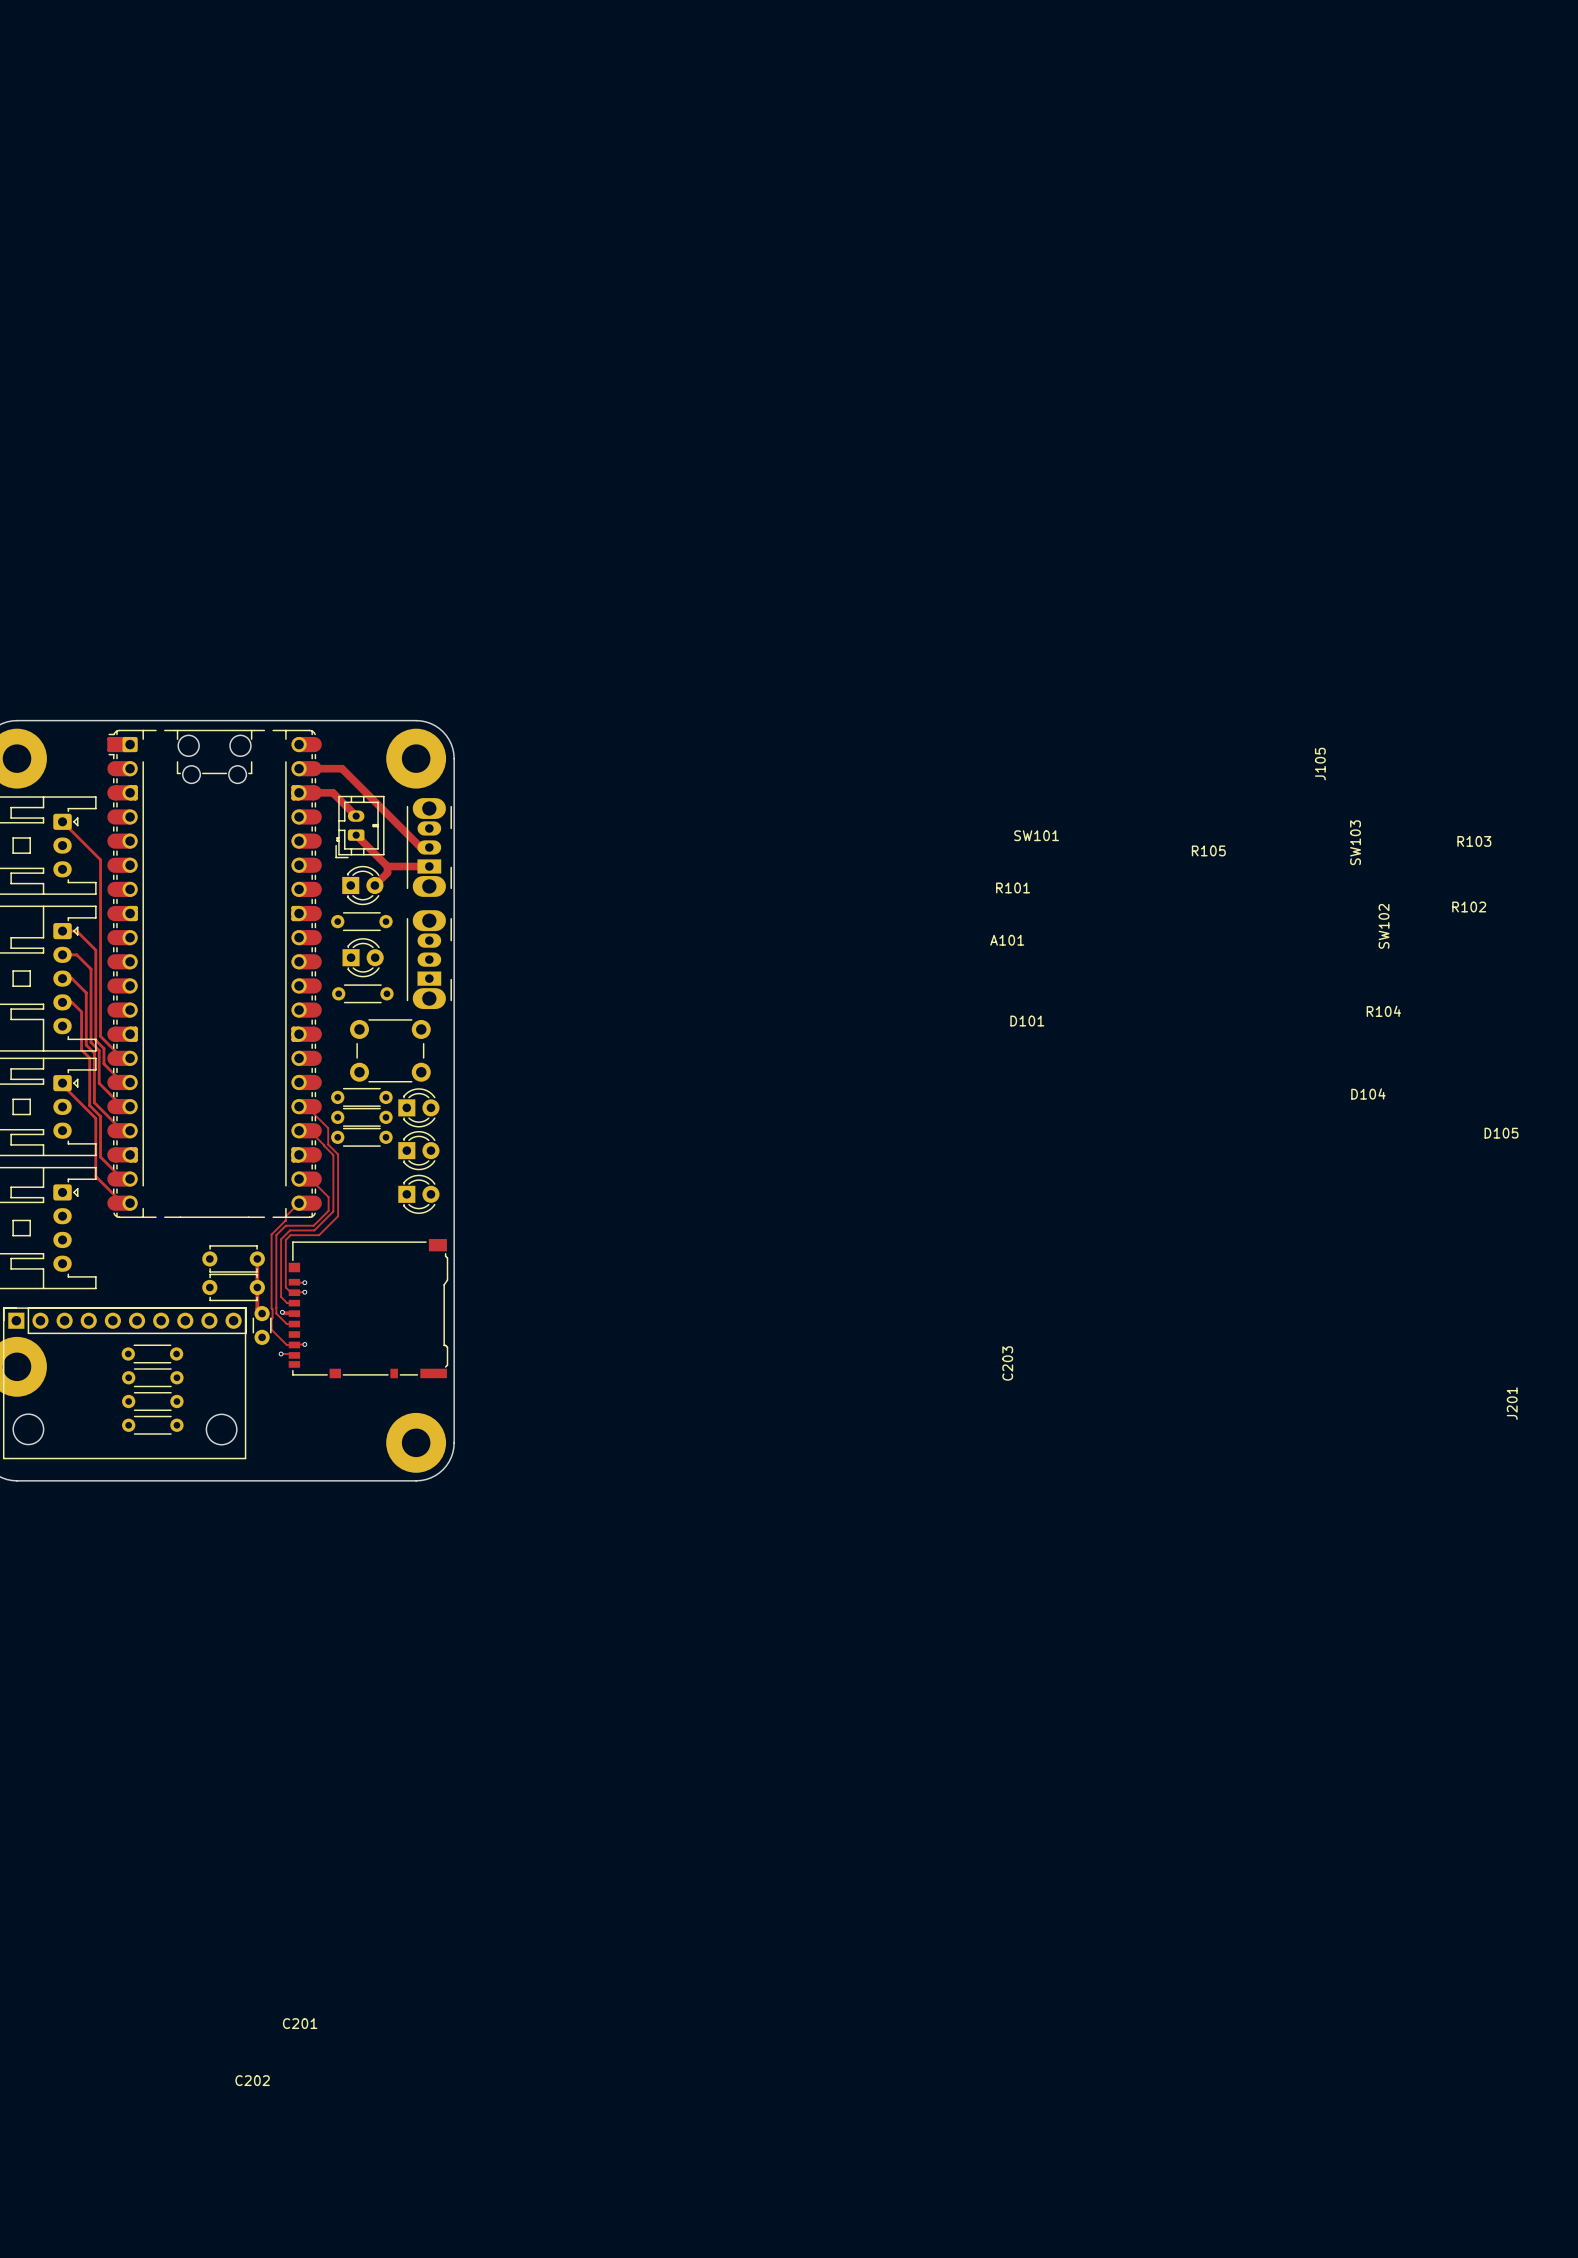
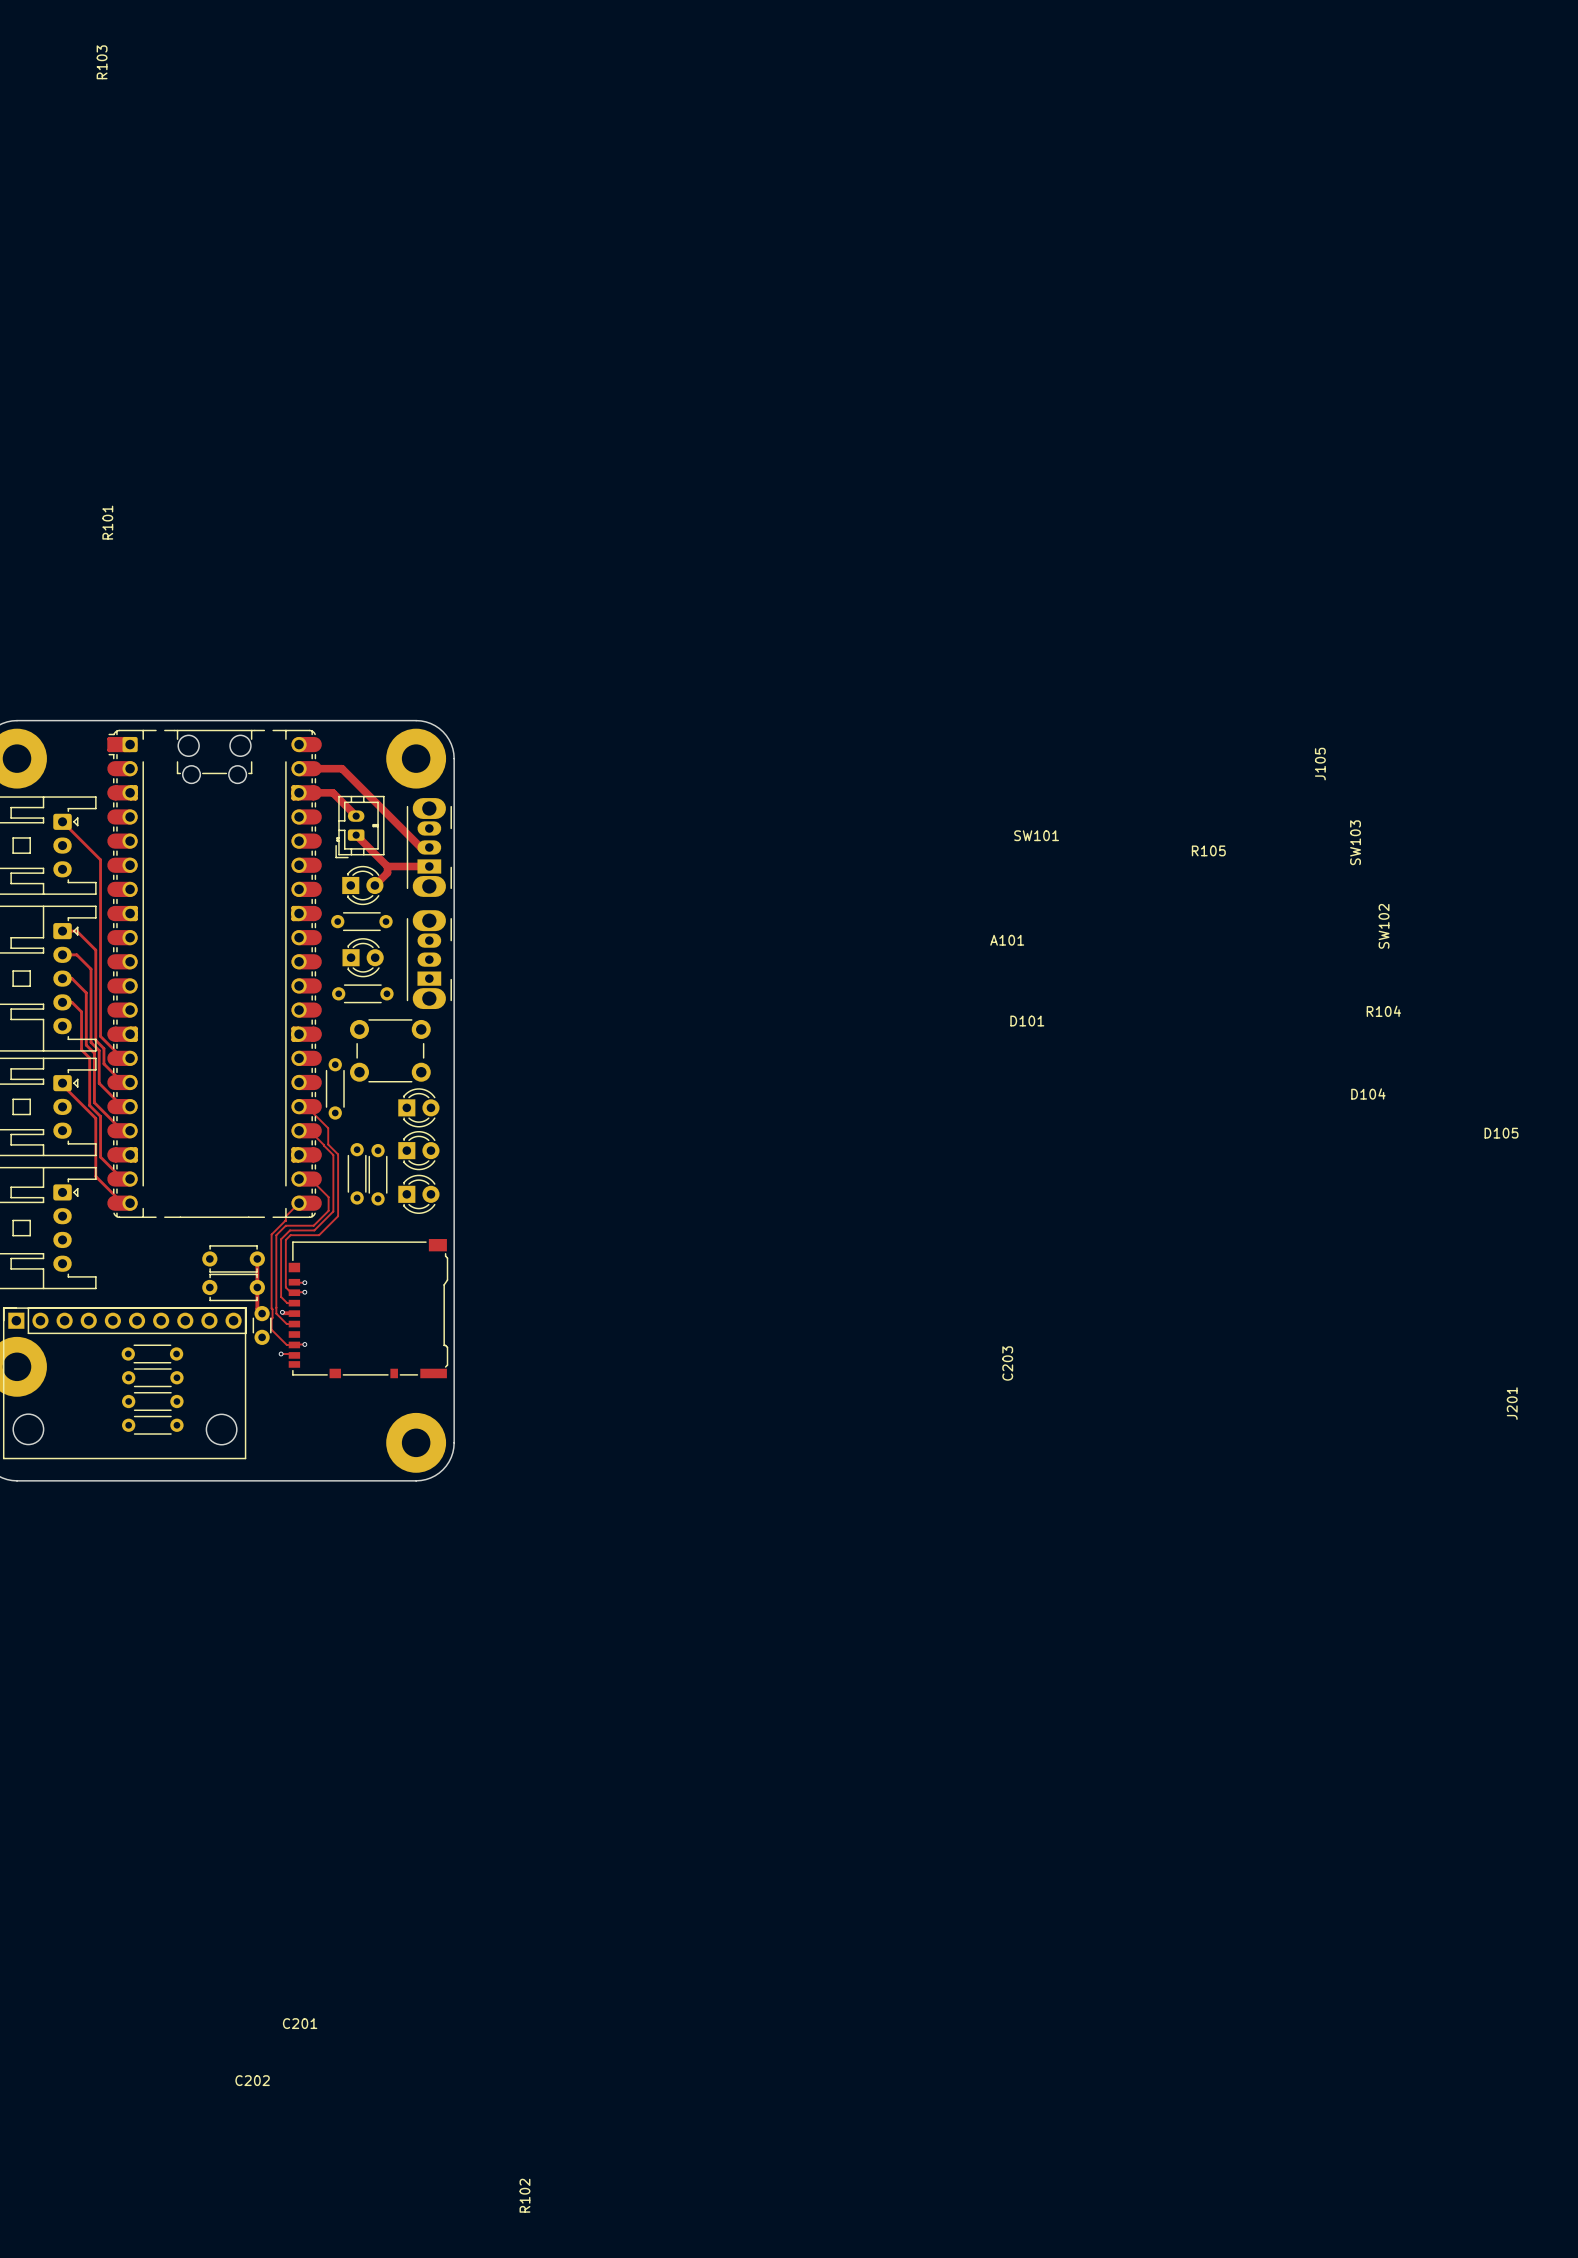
R103 name position: R103 (1474, 841) -> R103 (102, 62)
R101 name position: R101 (1013, 887) -> R101 (107, 522)
R102 rotation: 0° (361, 1097) -> 90° clockwise (335, 1088)
R103 rotation: 0° (361, 1117) -> 90° clockwise (378, 1174)
R103 position: (361, 1117) -> (378, 1174)
R101 rotation: 0° (361, 1137) -> 90° clockwise (357, 1173)

